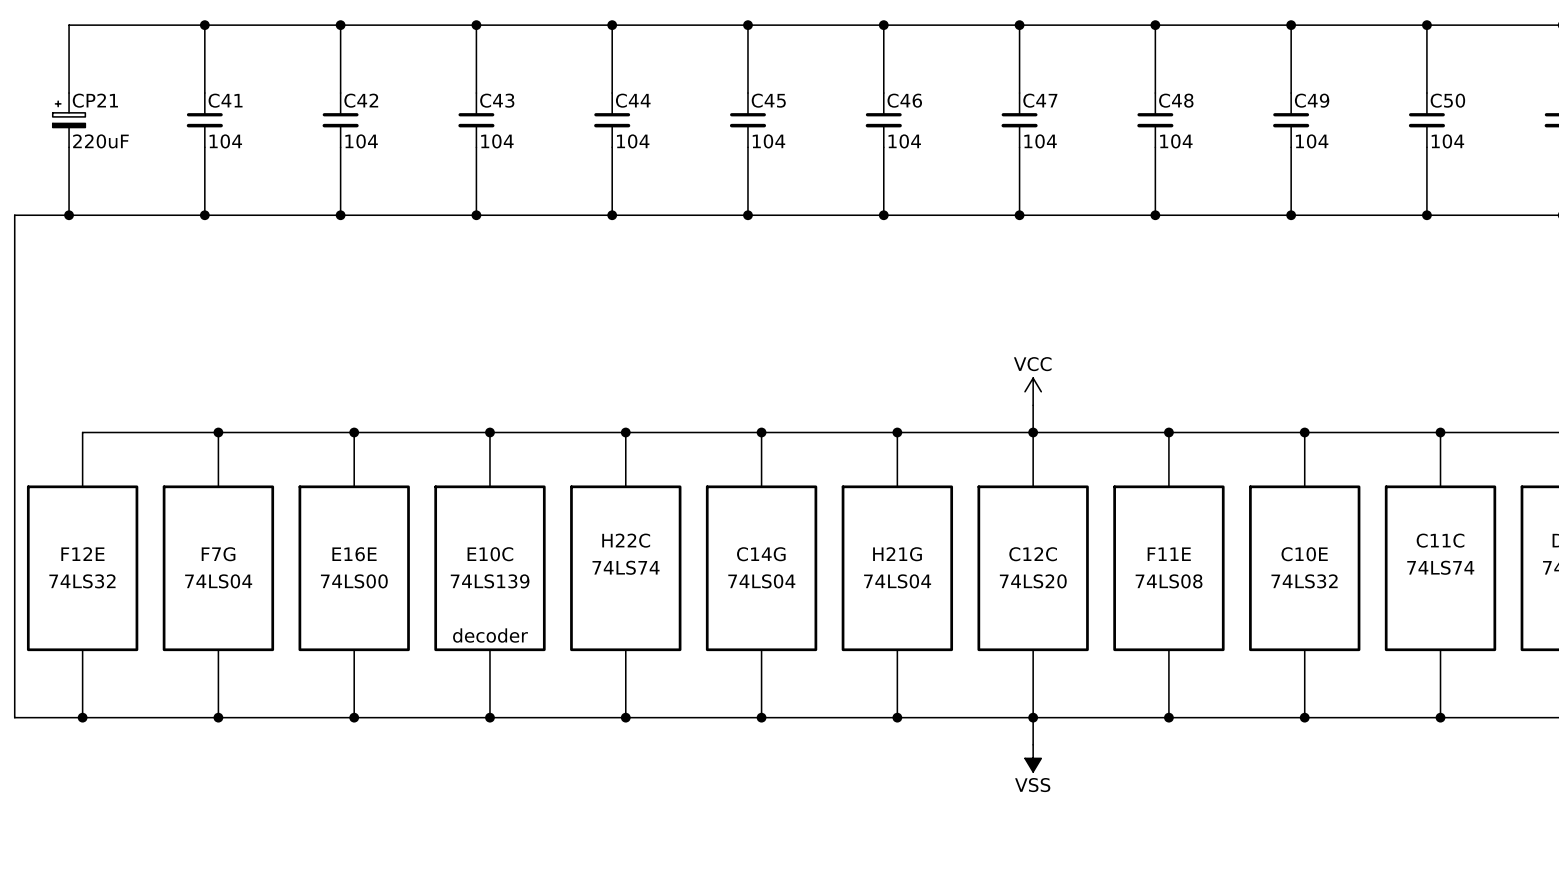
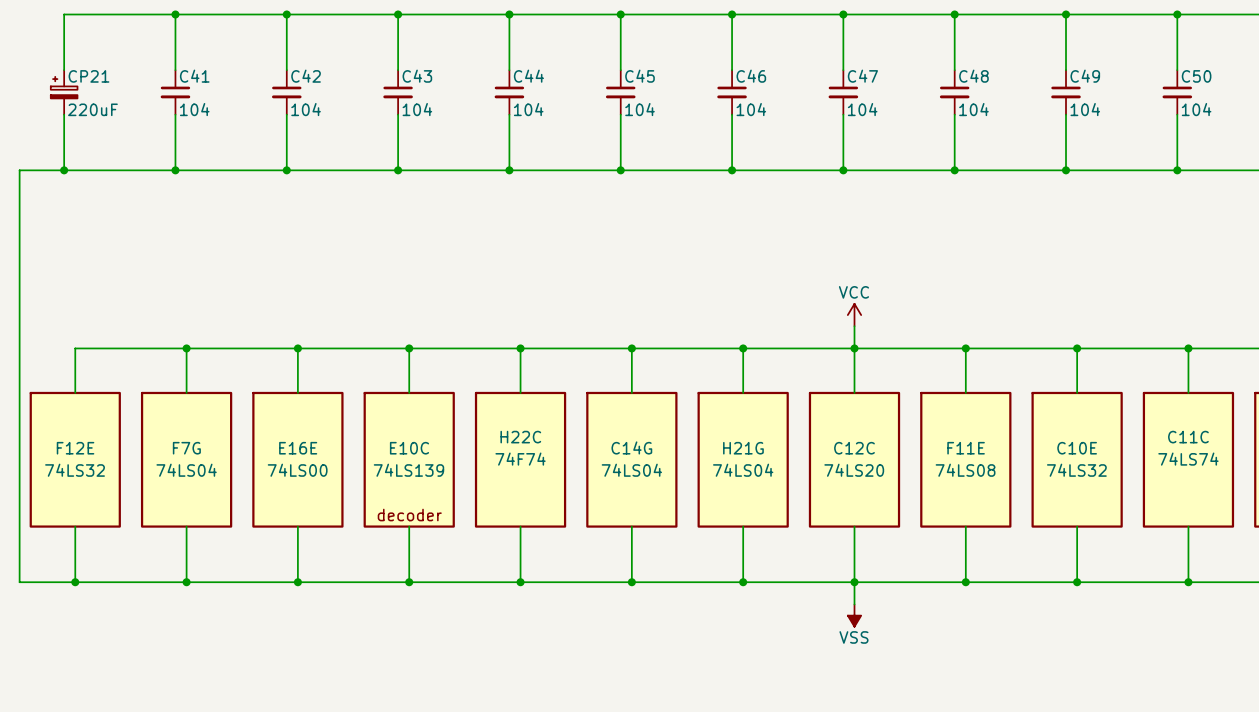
H22C value: 74LS74 (626, 567) -> 74F74 (520, 459)

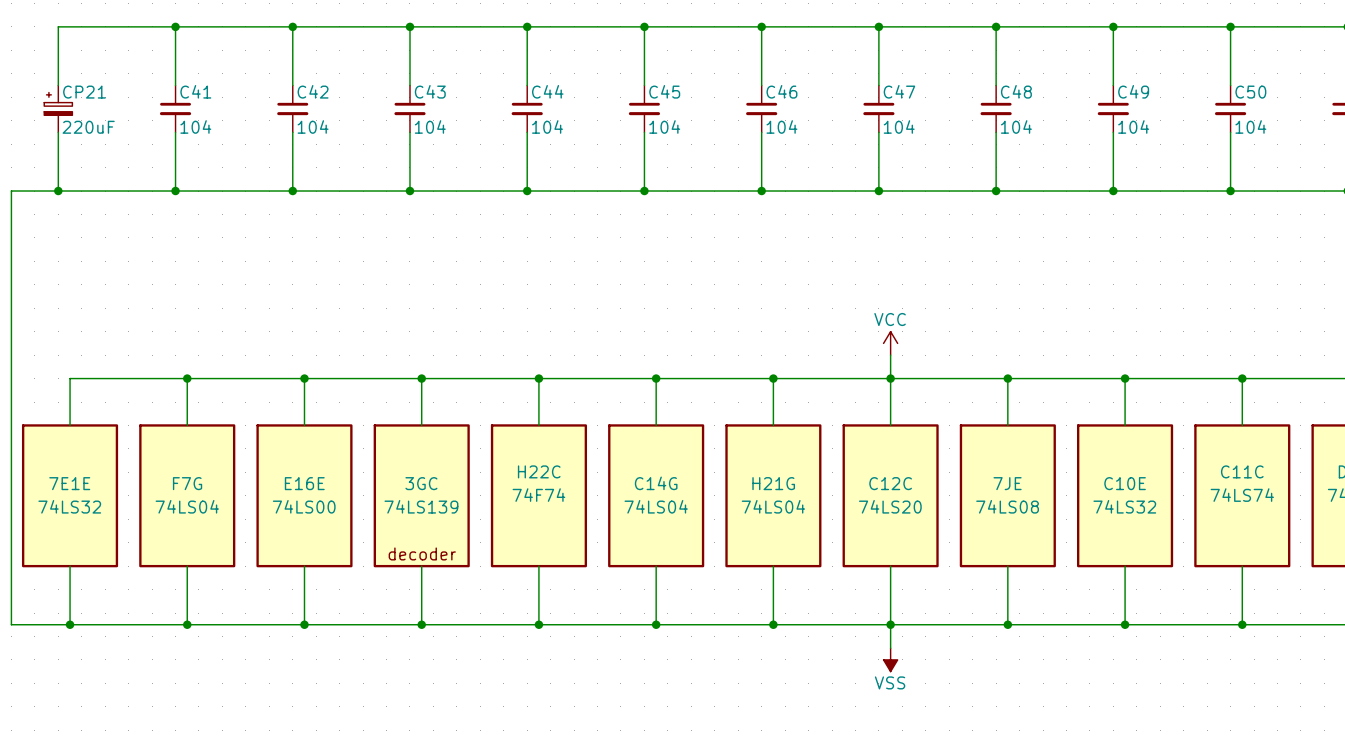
F12E name: F12E (75, 448) -> 7E1E (69, 483)
E10C name: E10C (409, 448) -> 3GC (421, 483)
F11E name: F11E (966, 448) -> 7JE (1007, 483)

